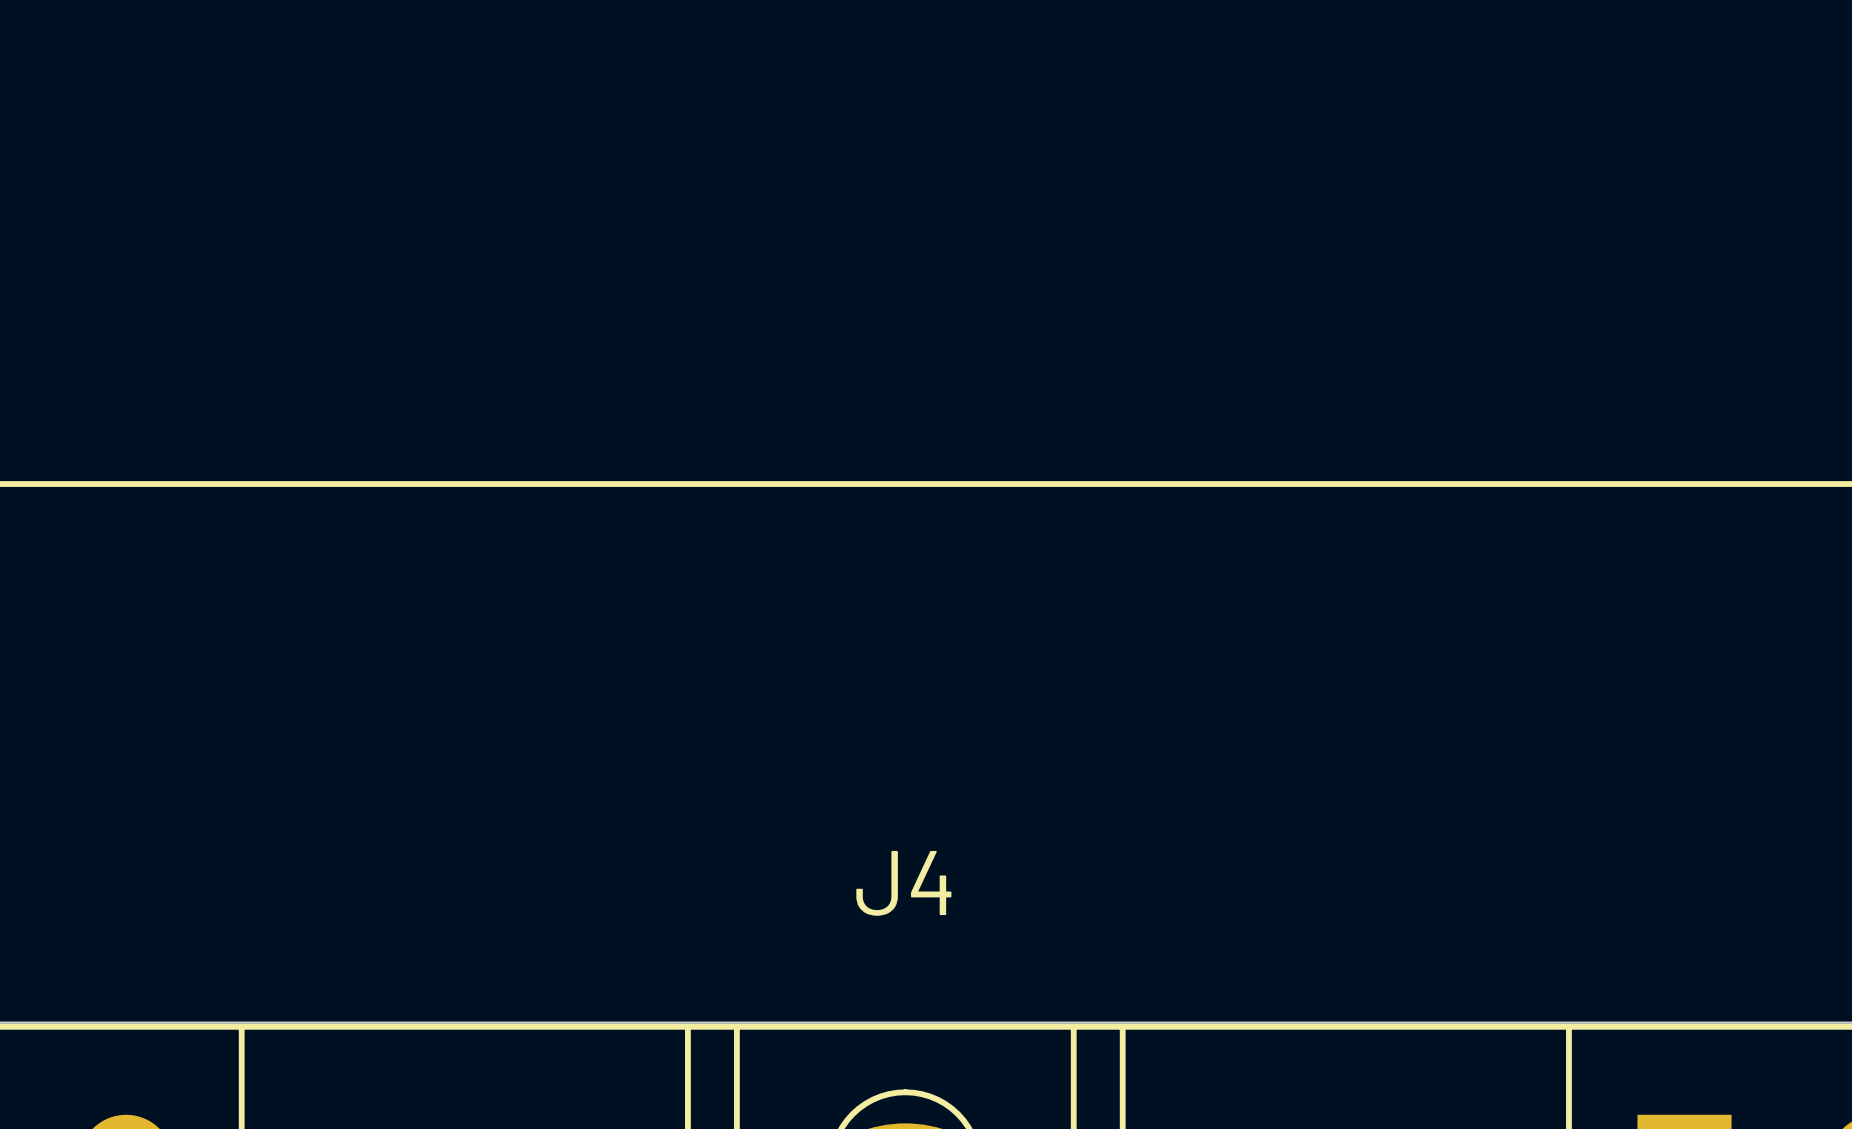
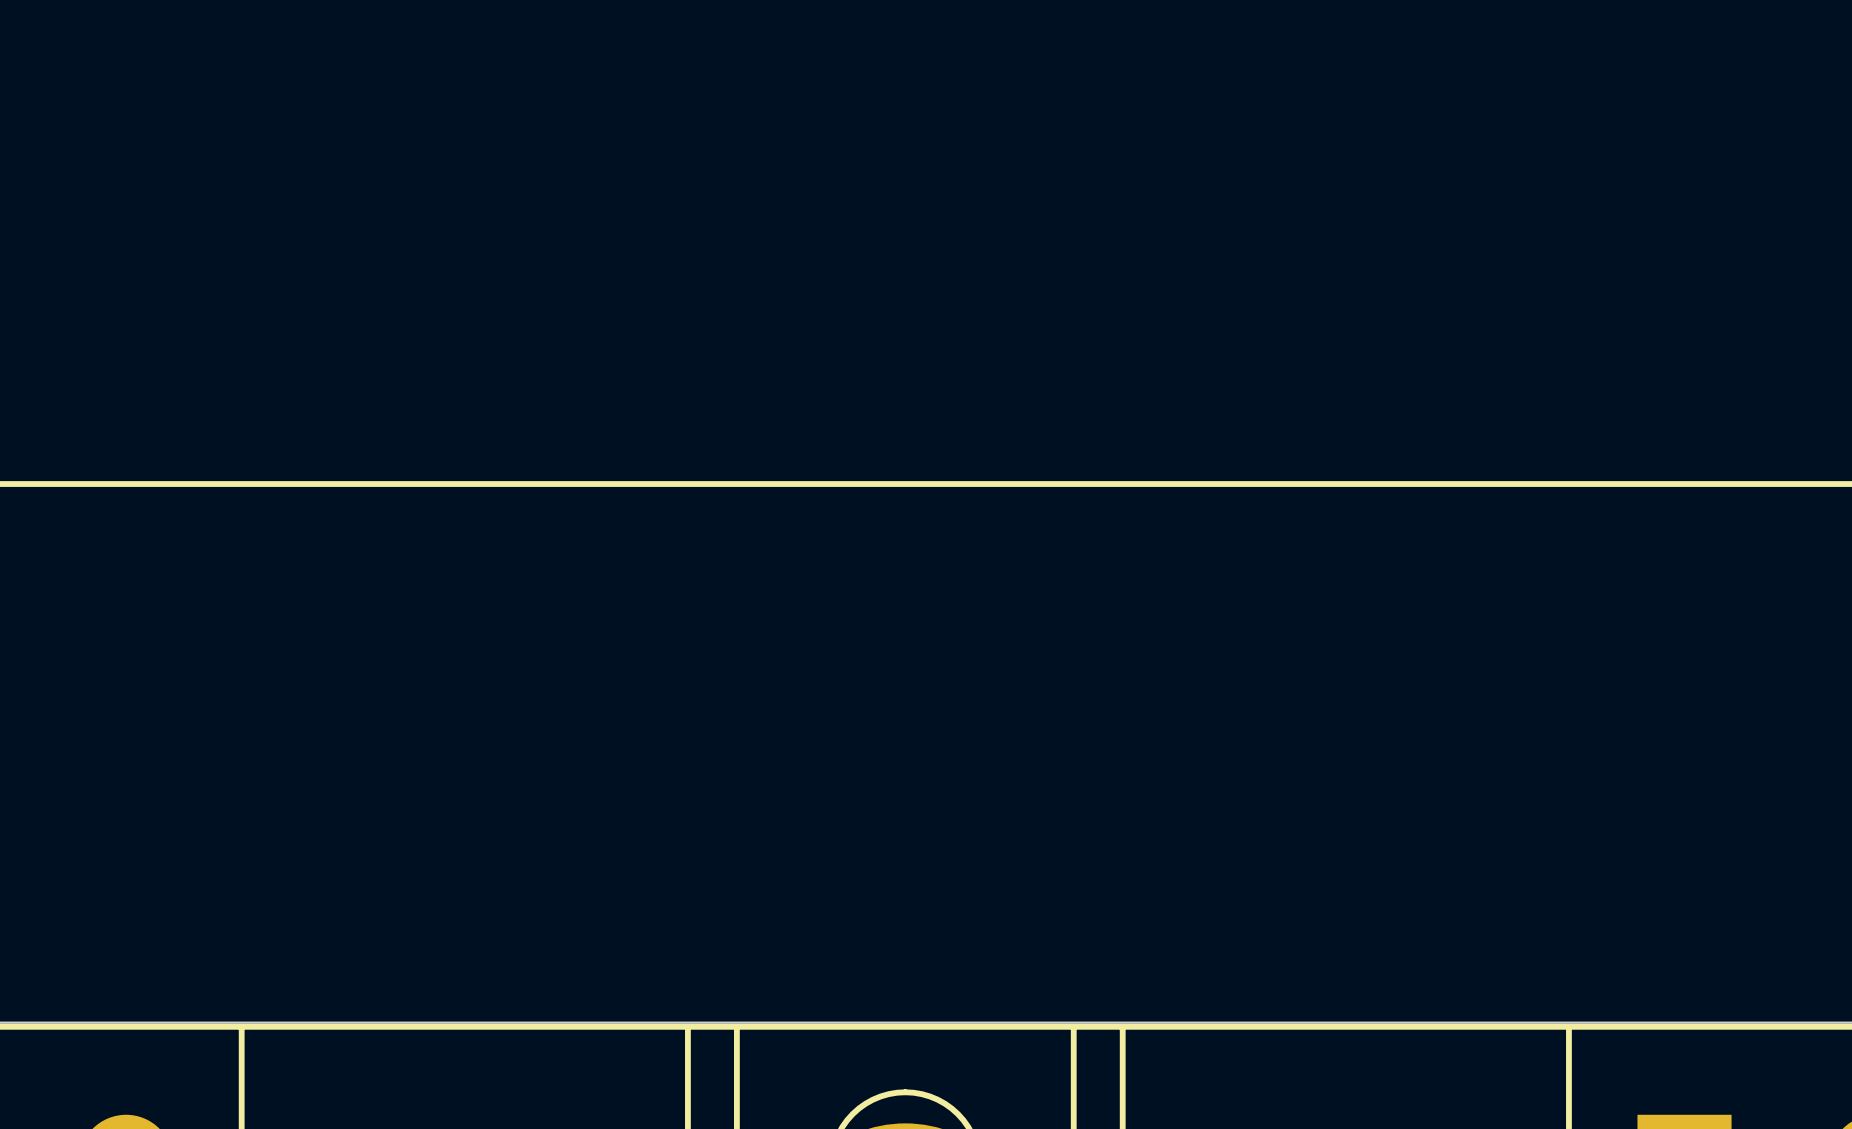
J4 name: J4 (903, 883) -> none

